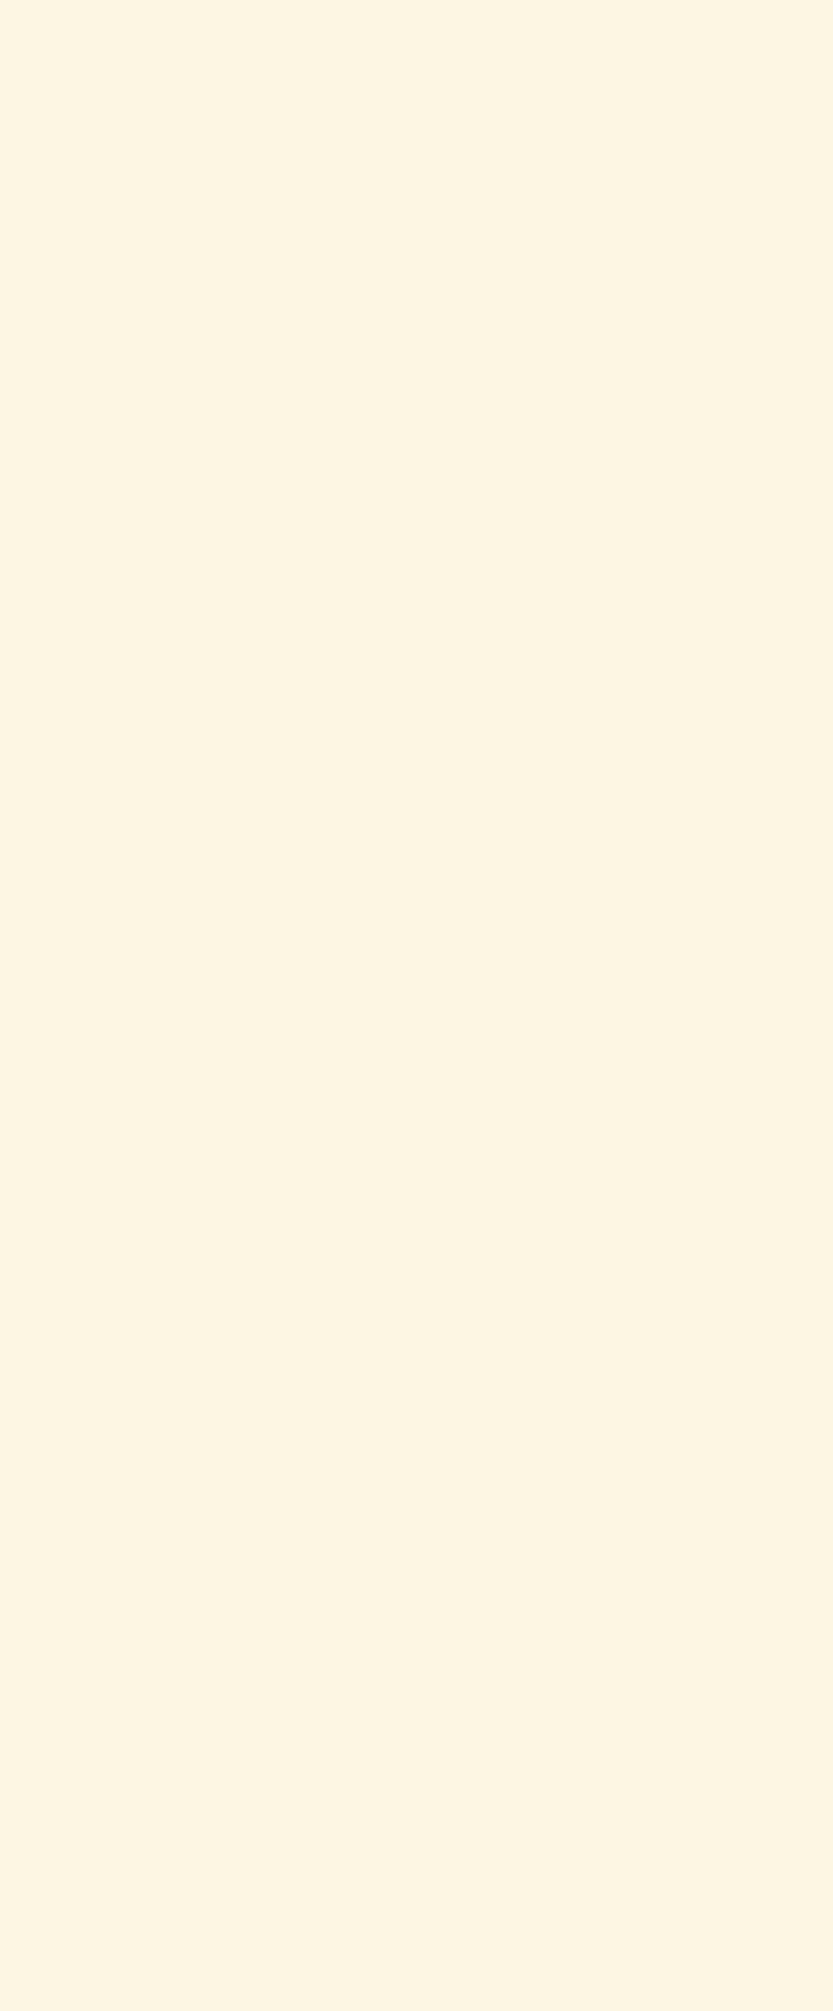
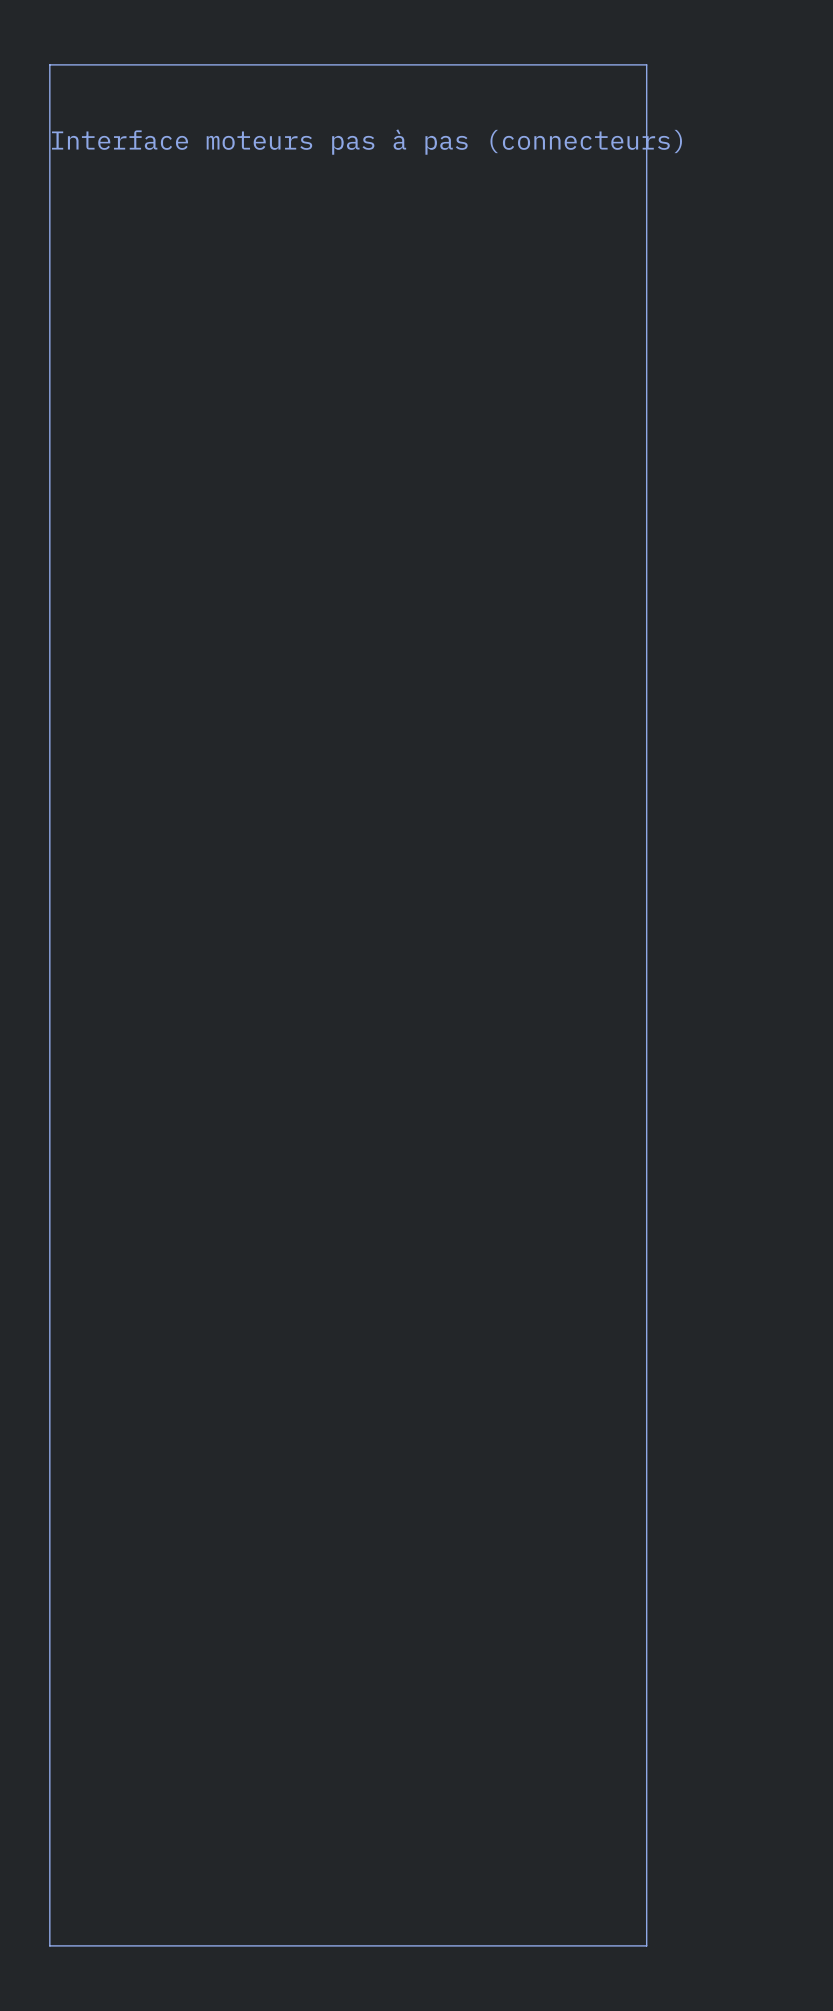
line: none -> (49, 64) (646, 64) (646, 1945) (49, 1945) (49, 64)
text: none -> Interface moteurs pas à pas (connecteurs) (366, 142)

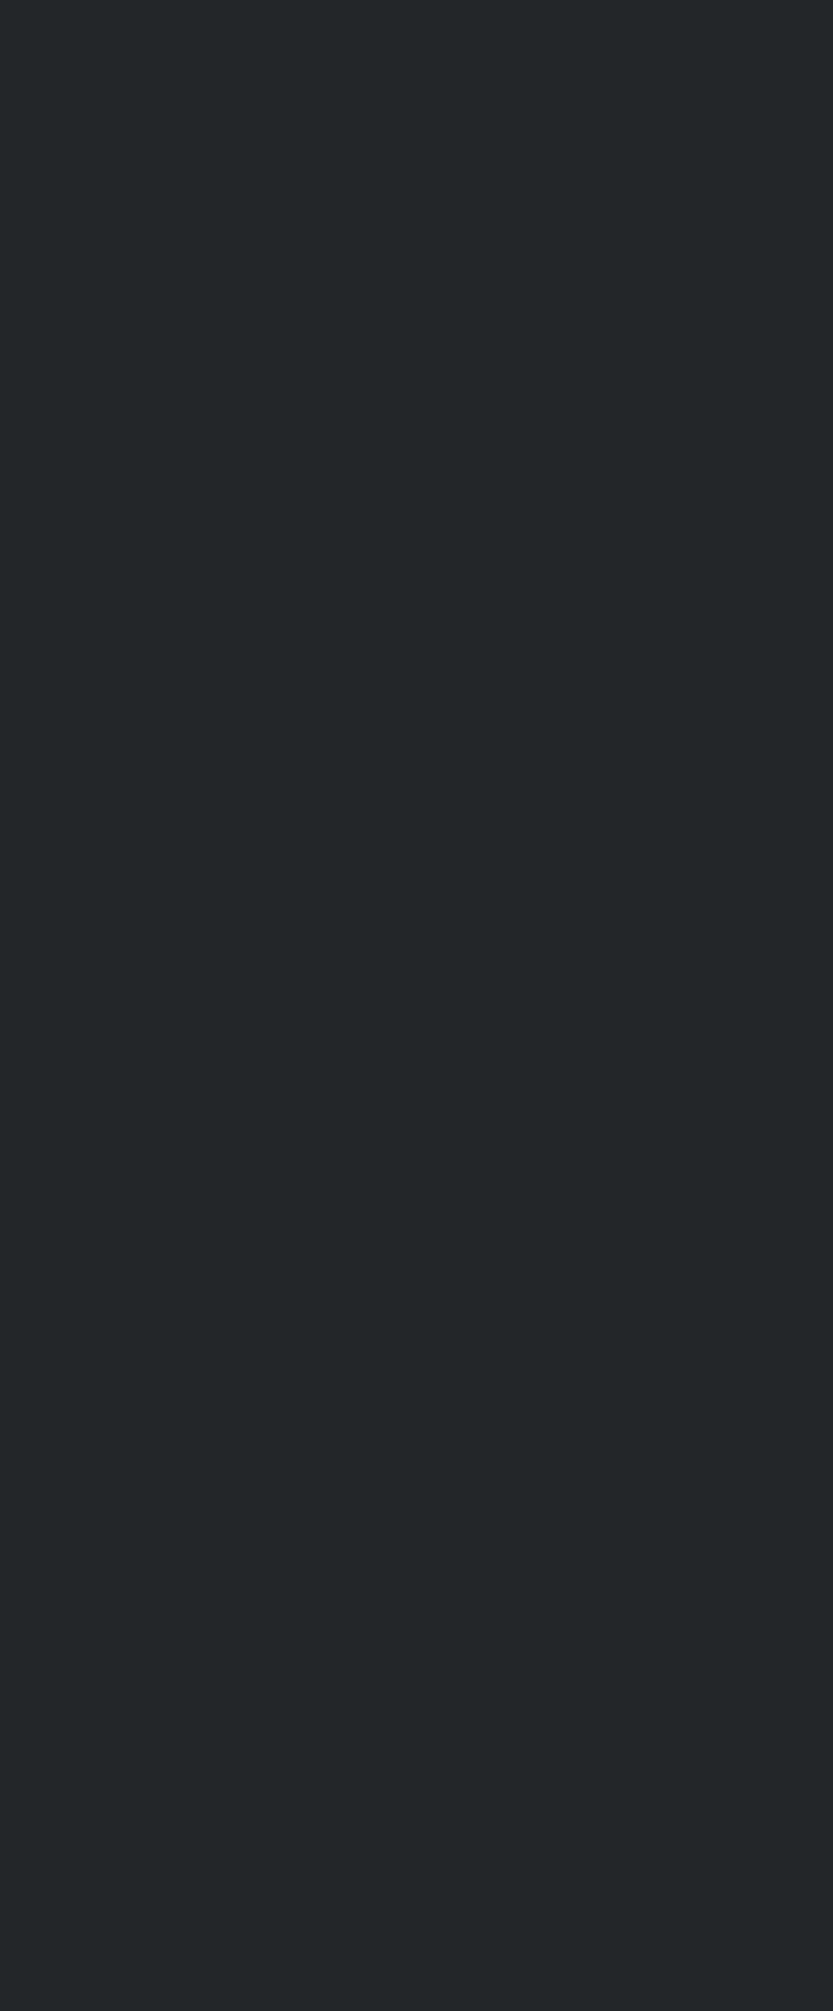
line: (49, 64) (646, 64) (646, 1945) (49, 1945) (49, 64) -> none
text: Interface moteurs pas à pas (connecteurs) (366, 142) -> none

